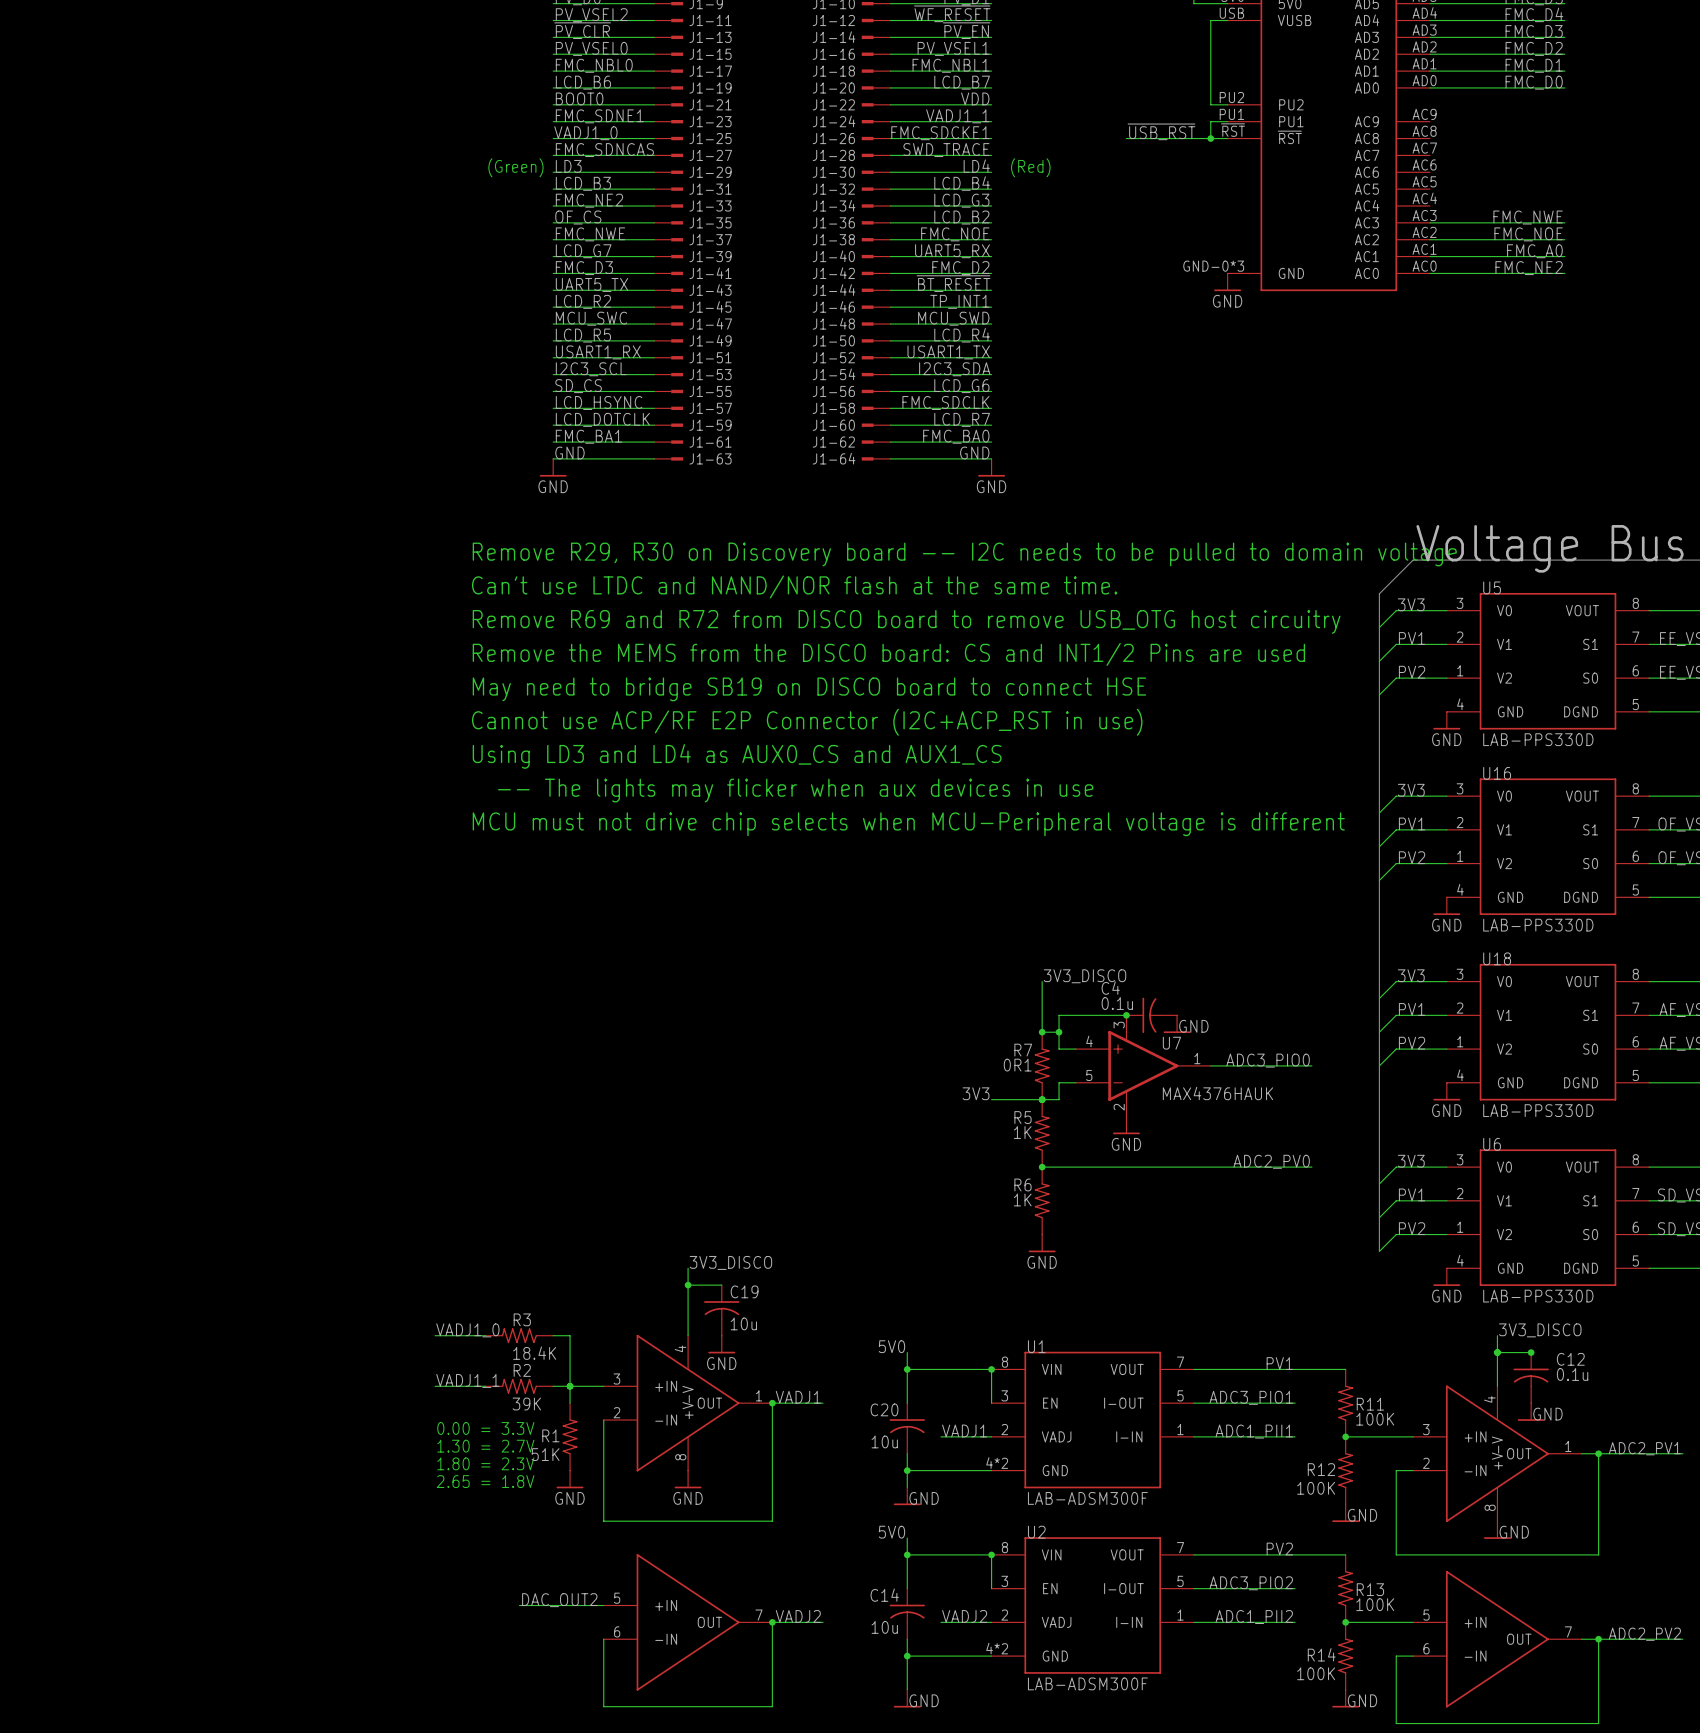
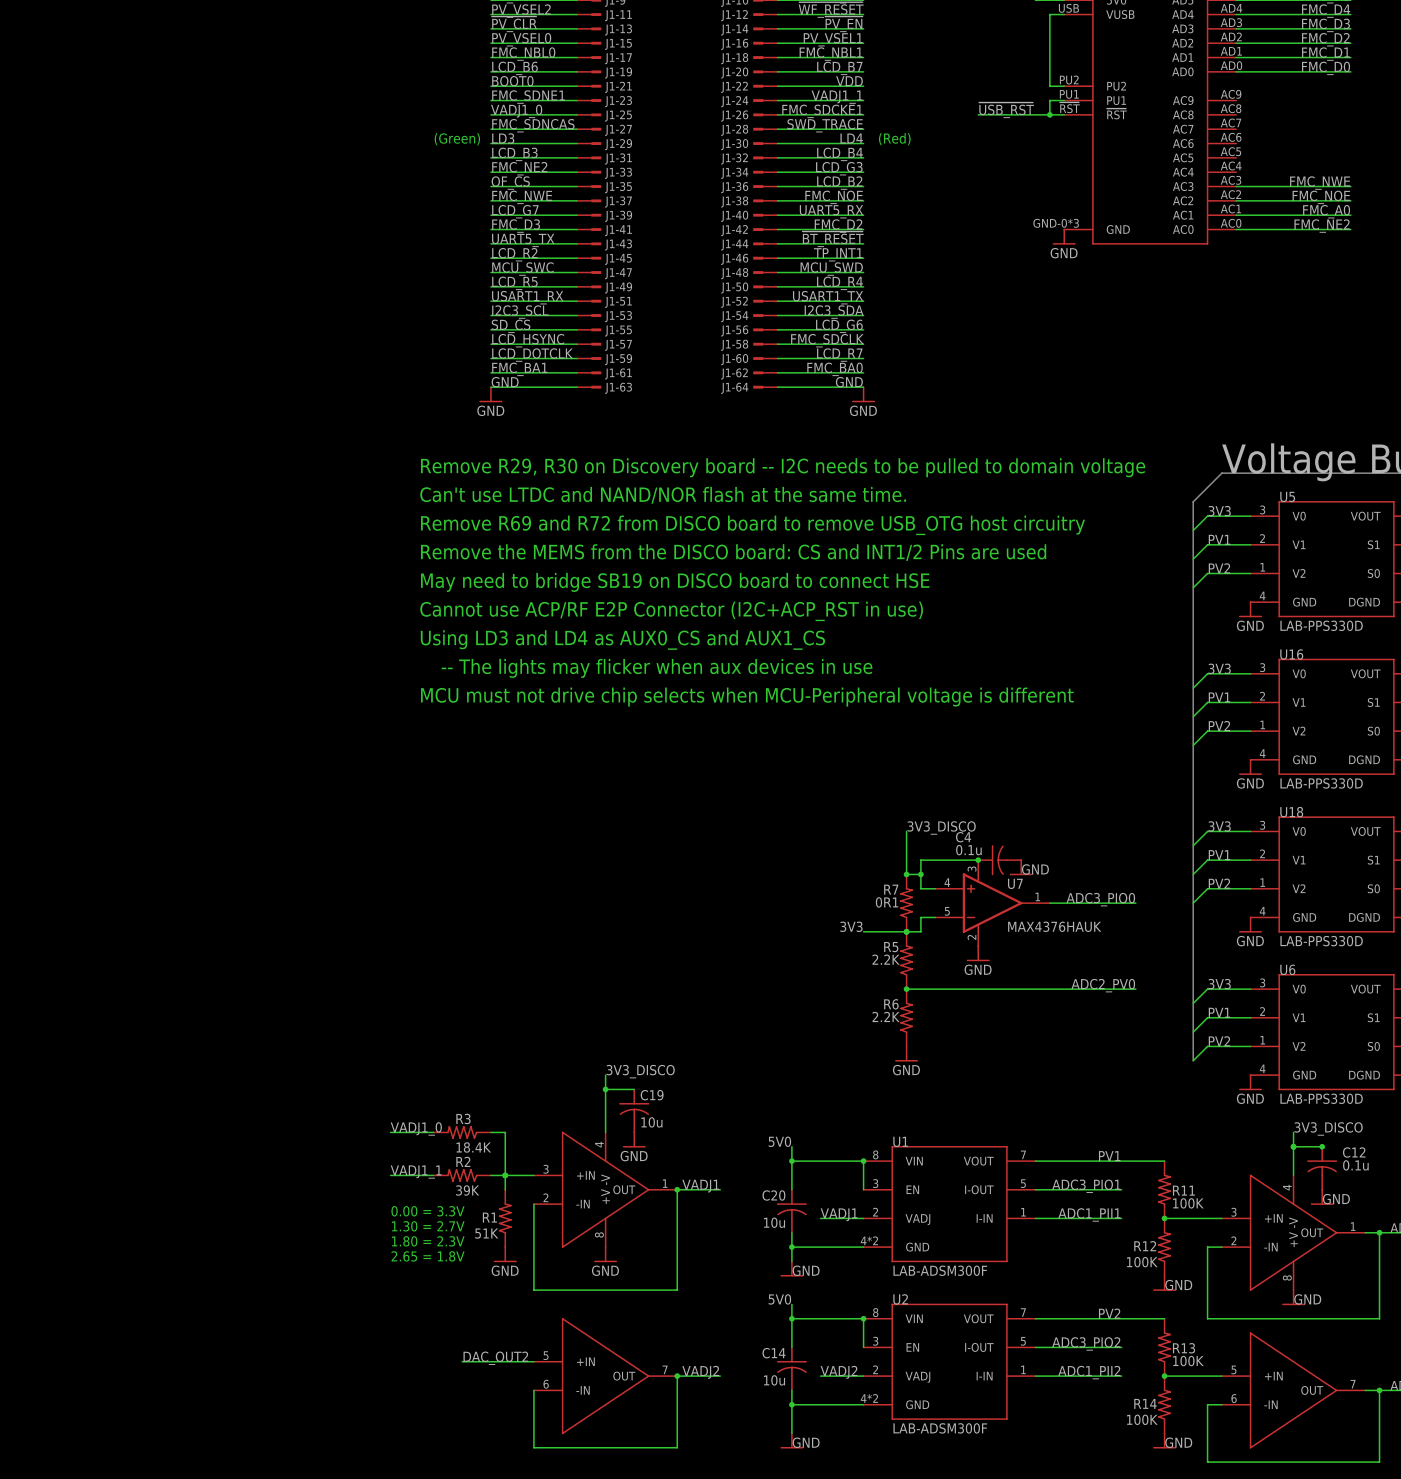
R5 value: 1K (1022, 1132) -> 2.2K (886, 959)
R6 value: 1K (1022, 1199) -> 2.2K (886, 1016)

